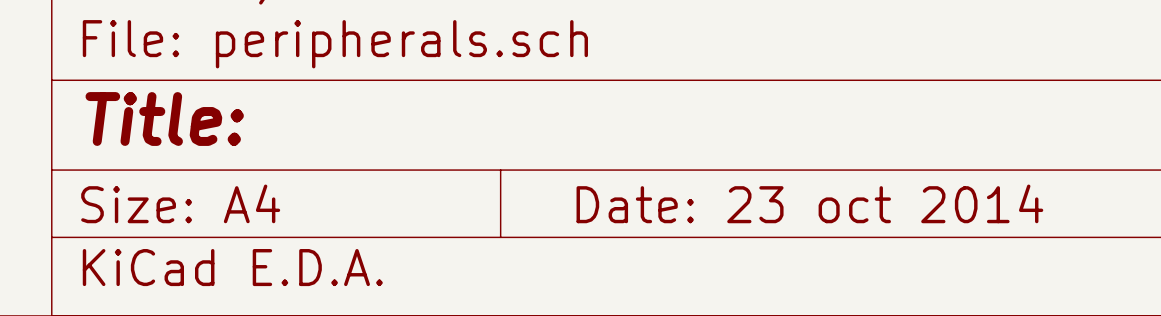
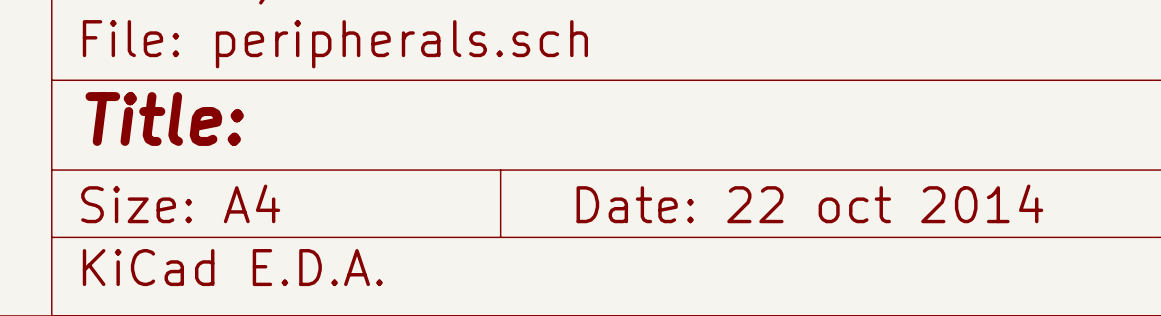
title block: Date: 23 oct 2014 (809, 203) -> Date: 22 oct 2014 (809, 203)

